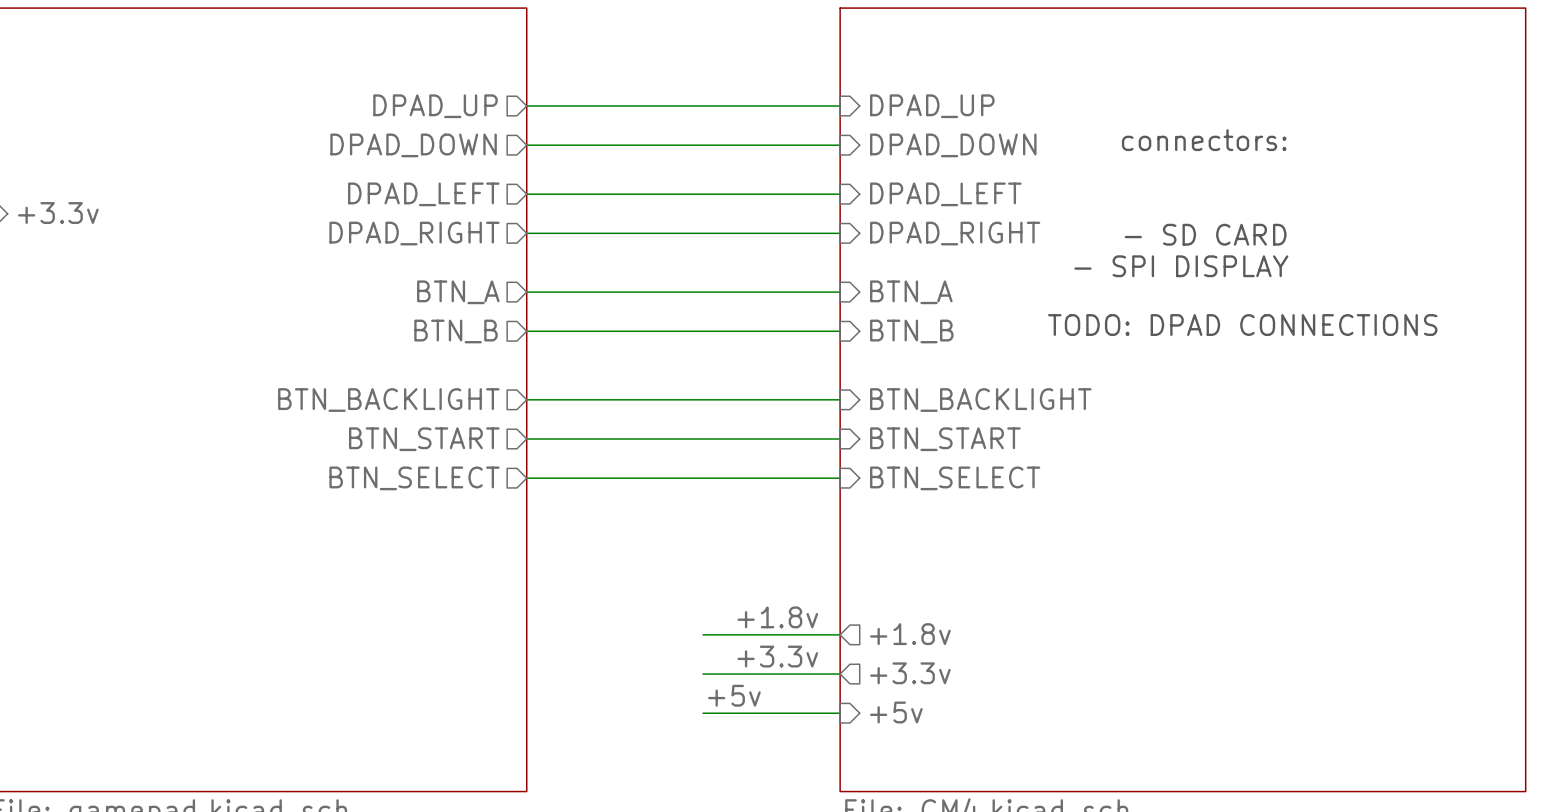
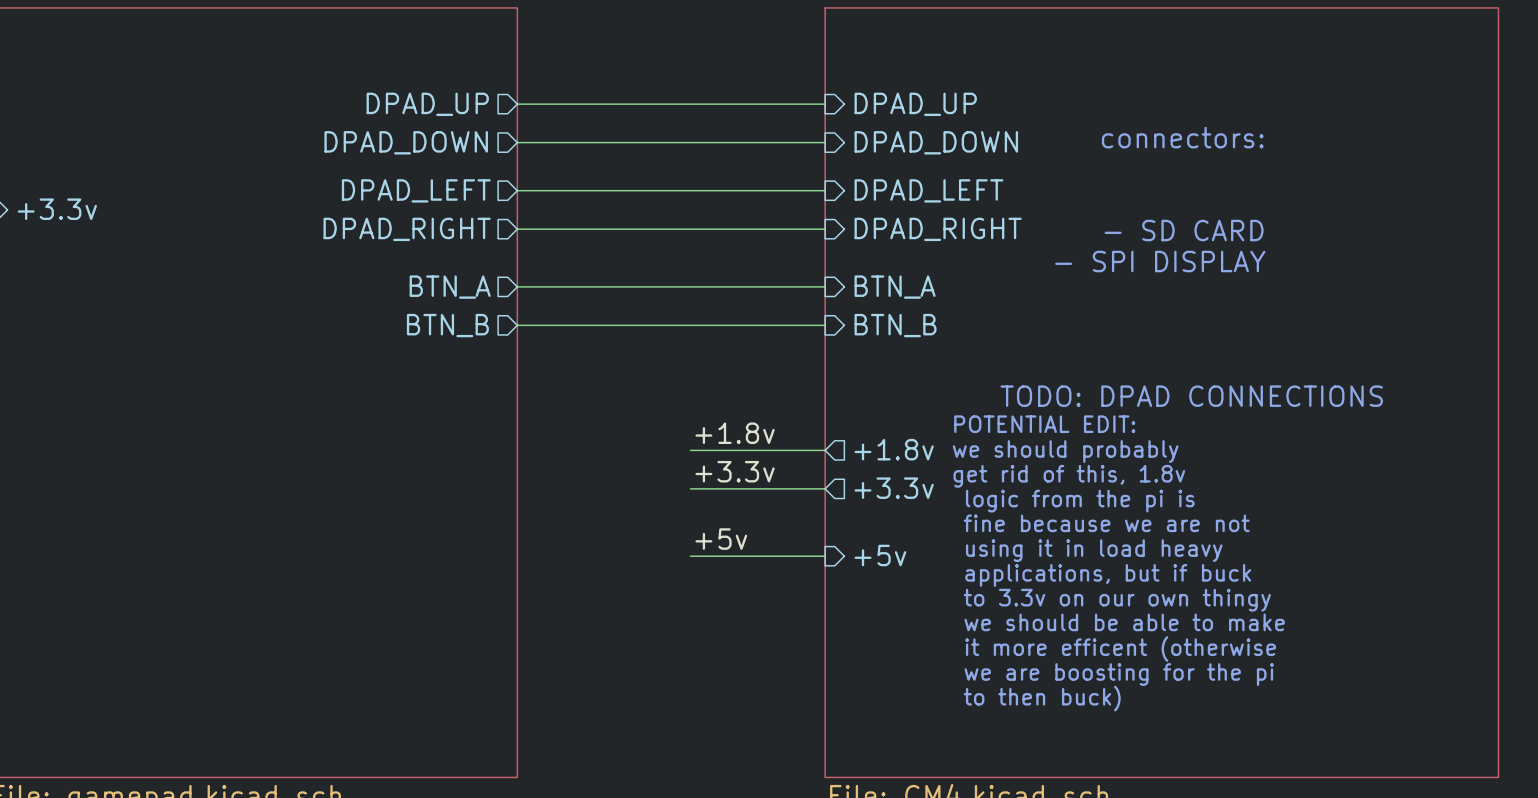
text position: TODO: DPAD CONNECTIONS (1242, 325) -> TODO: DPAD CONNECTIONS (1191, 396)
wire: (526, 399) (840, 399) -> none
sheet pin: BTN_BACKLIGHT (388, 400) -> none
sheet pin: BTN_BACKLIGHT (980, 400) -> none
text: none -> POTENTIAL EDIT: (1044, 424)
sheet pin: BTN_START (424, 439) -> none
wire: (526, 439) (840, 439) -> none
sheet pin: BTN_START (945, 439) -> none
text: none -> we should probably (1065, 451)
sheet pin: BTN_SELECT (414, 478) -> none
wire: (526, 478) (840, 478) -> none
sheet pin: BTN_SELECT (955, 478) -> none
text: none -> get rid of this, 1.8v (1069, 476)
text: none -> logic from the pi is (1080, 501)
text: none -> fine because we are not (1106, 523)
text: none -> using it in load heavy (1094, 550)
text: none -> applications, but if buck (1108, 575)
text: none -> to 3.3v on our own thingy (1117, 600)
label position: +1.8v (777, 617) -> +1.8v (735, 433)
text: none -> we should be able to make (1124, 622)
wire: (703, 634) (840, 634) -> (690, 450) (825, 450)
sheet pin position: +1.8v (910, 634) -> +1.8v (894, 449)
label position: +3.3v (777, 656) -> +3.3v (735, 471)
text: none -> it more efficent (otherwise (1120, 649)
sheet pin position: +3.3v (910, 673) -> +3.3v (894, 488)
wire: (703, 674) (840, 674) -> (690, 488) (825, 488)
text: none -> we are boosting for the pi (1119, 674)
label position: +5v (734, 695) -> +5v (721, 539)
text: none -> to then buck) (1042, 698)
sheet pin position: +5v (896, 712) -> +5v (880, 555)
wire: (703, 713) (840, 713) -> (690, 556) (825, 556)

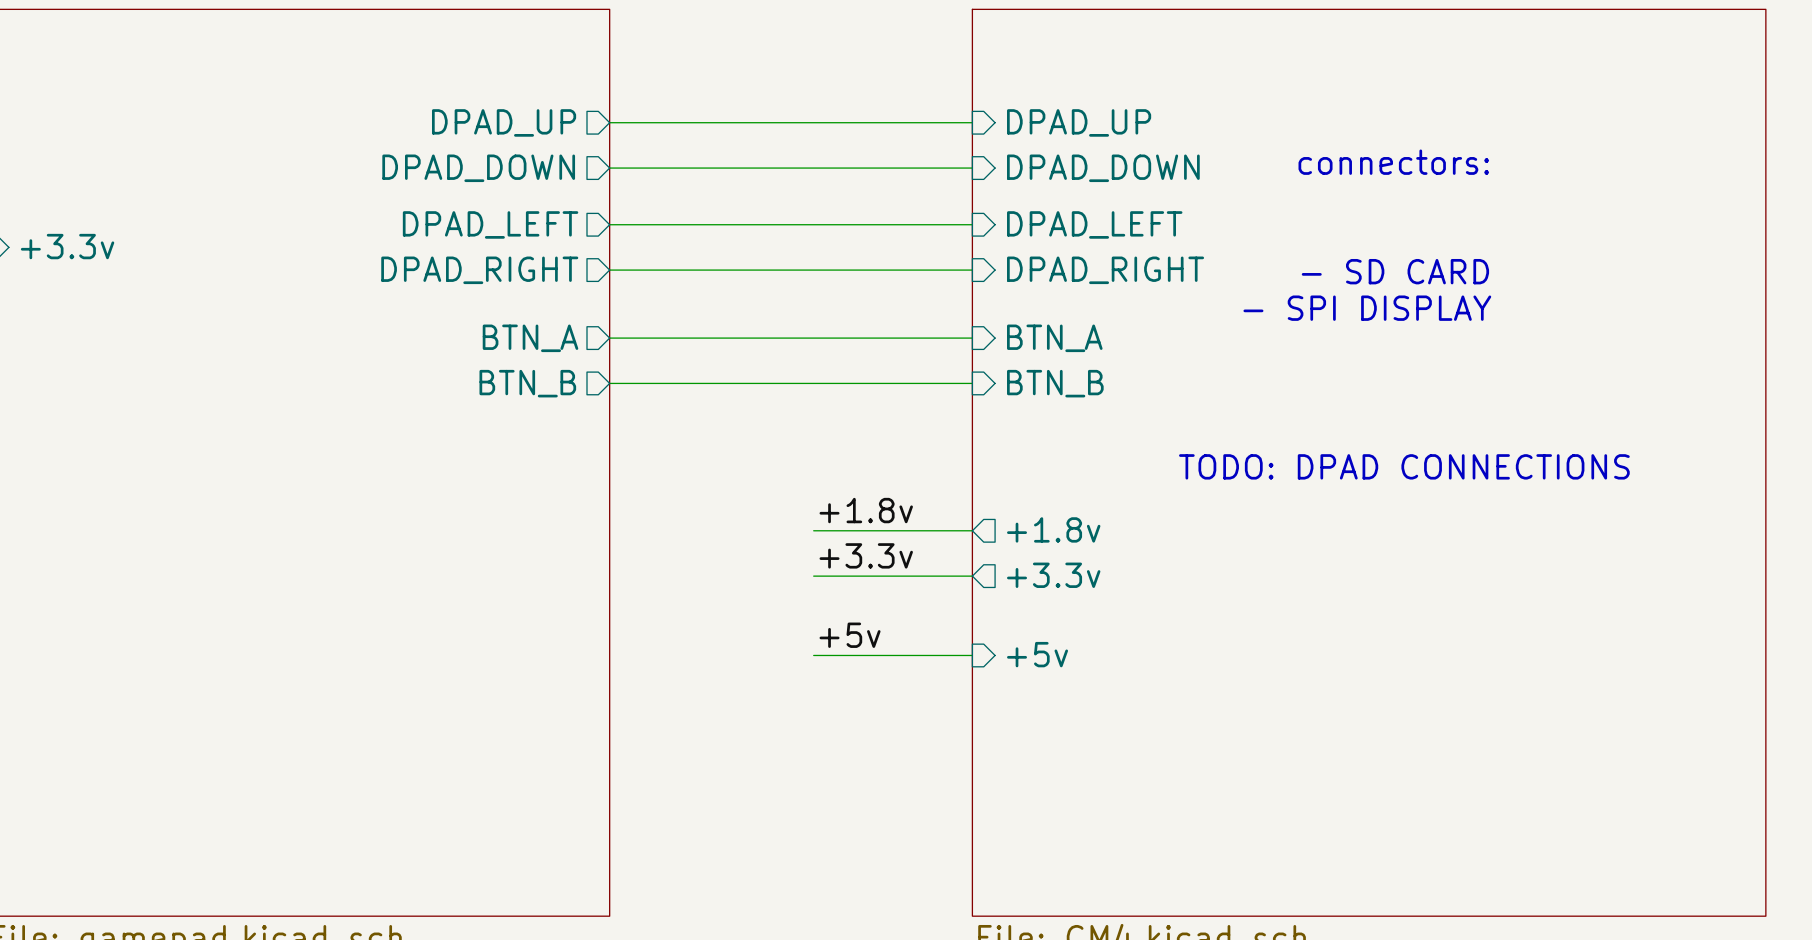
text: POTENTIAL EDIT: (1044, 424) -> none
text: we should probably (1065, 451) -> none
text: get rid of this, 1.8v (1069, 476) -> none
text: logic from the pi is (1080, 501) -> none
text: fine because we are not (1106, 523) -> none
text: using it in load heavy (1094, 550) -> none
text: applications, but if buck (1108, 575) -> none
text: to 3.3v on our own thingy (1117, 600) -> none
text: we should be able to make (1124, 622) -> none
text: it more efficent (otherwise (1120, 649) -> none
text: we are boosting for the pi (1119, 674) -> none
text: to then buck) (1042, 698) -> none

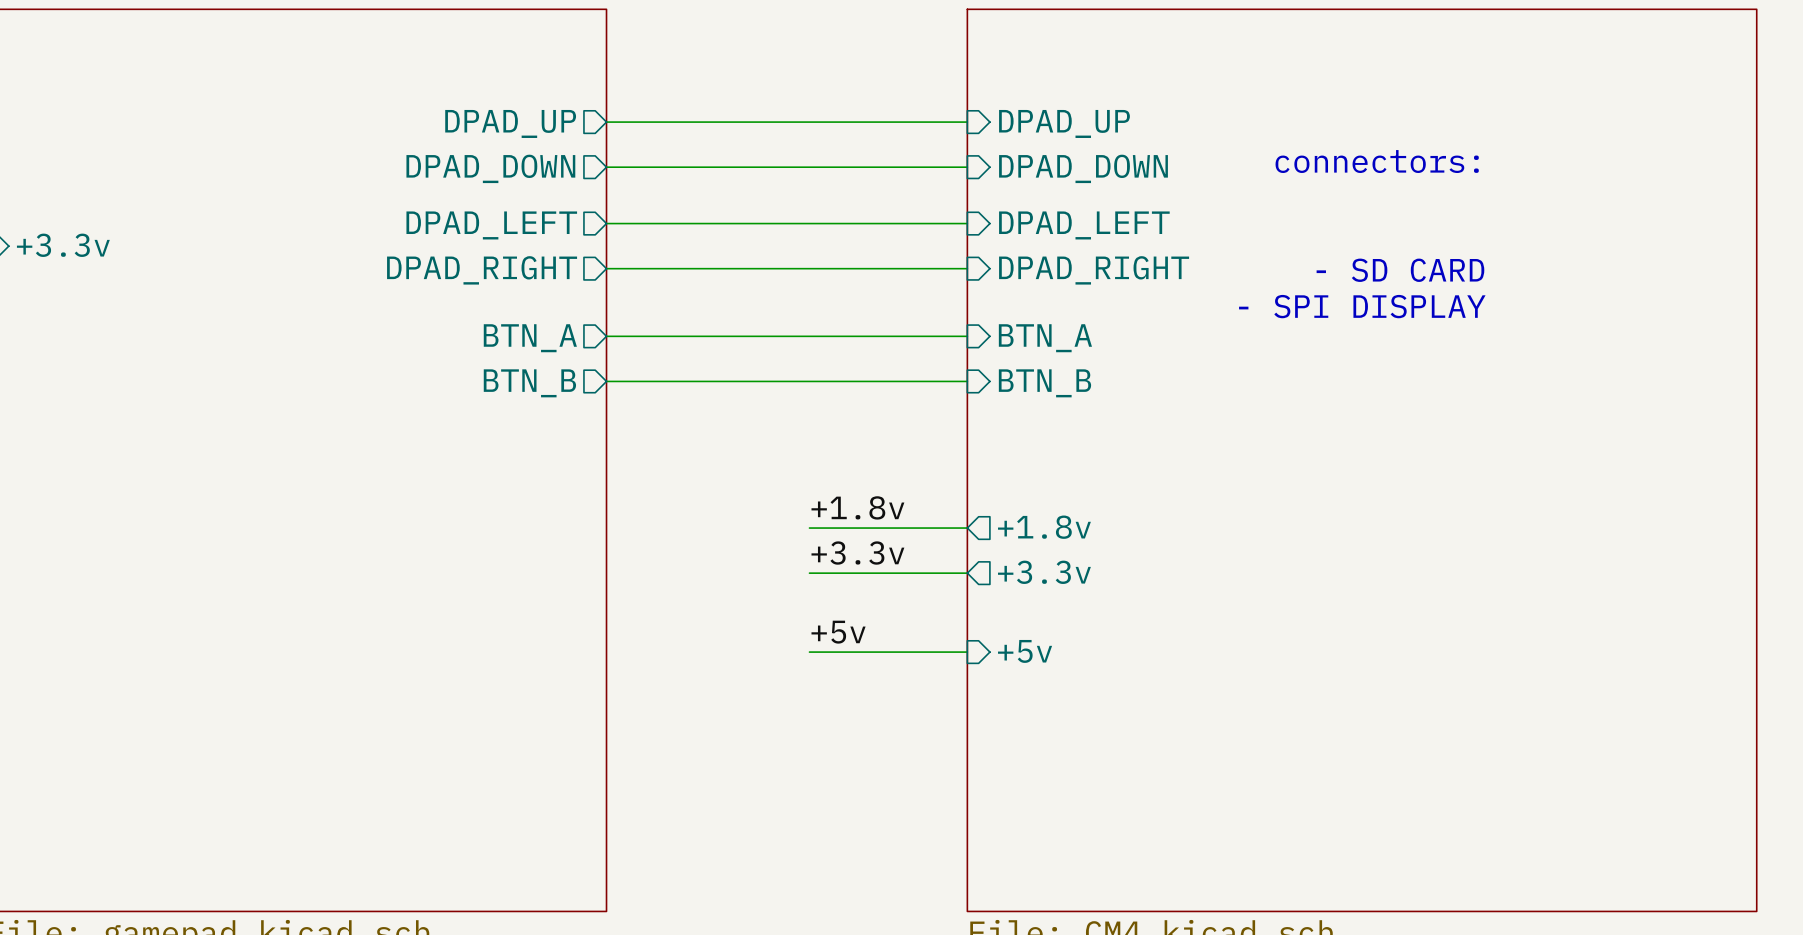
text: TODO: DPAD CONNECTIONS (1404, 466) -> none

